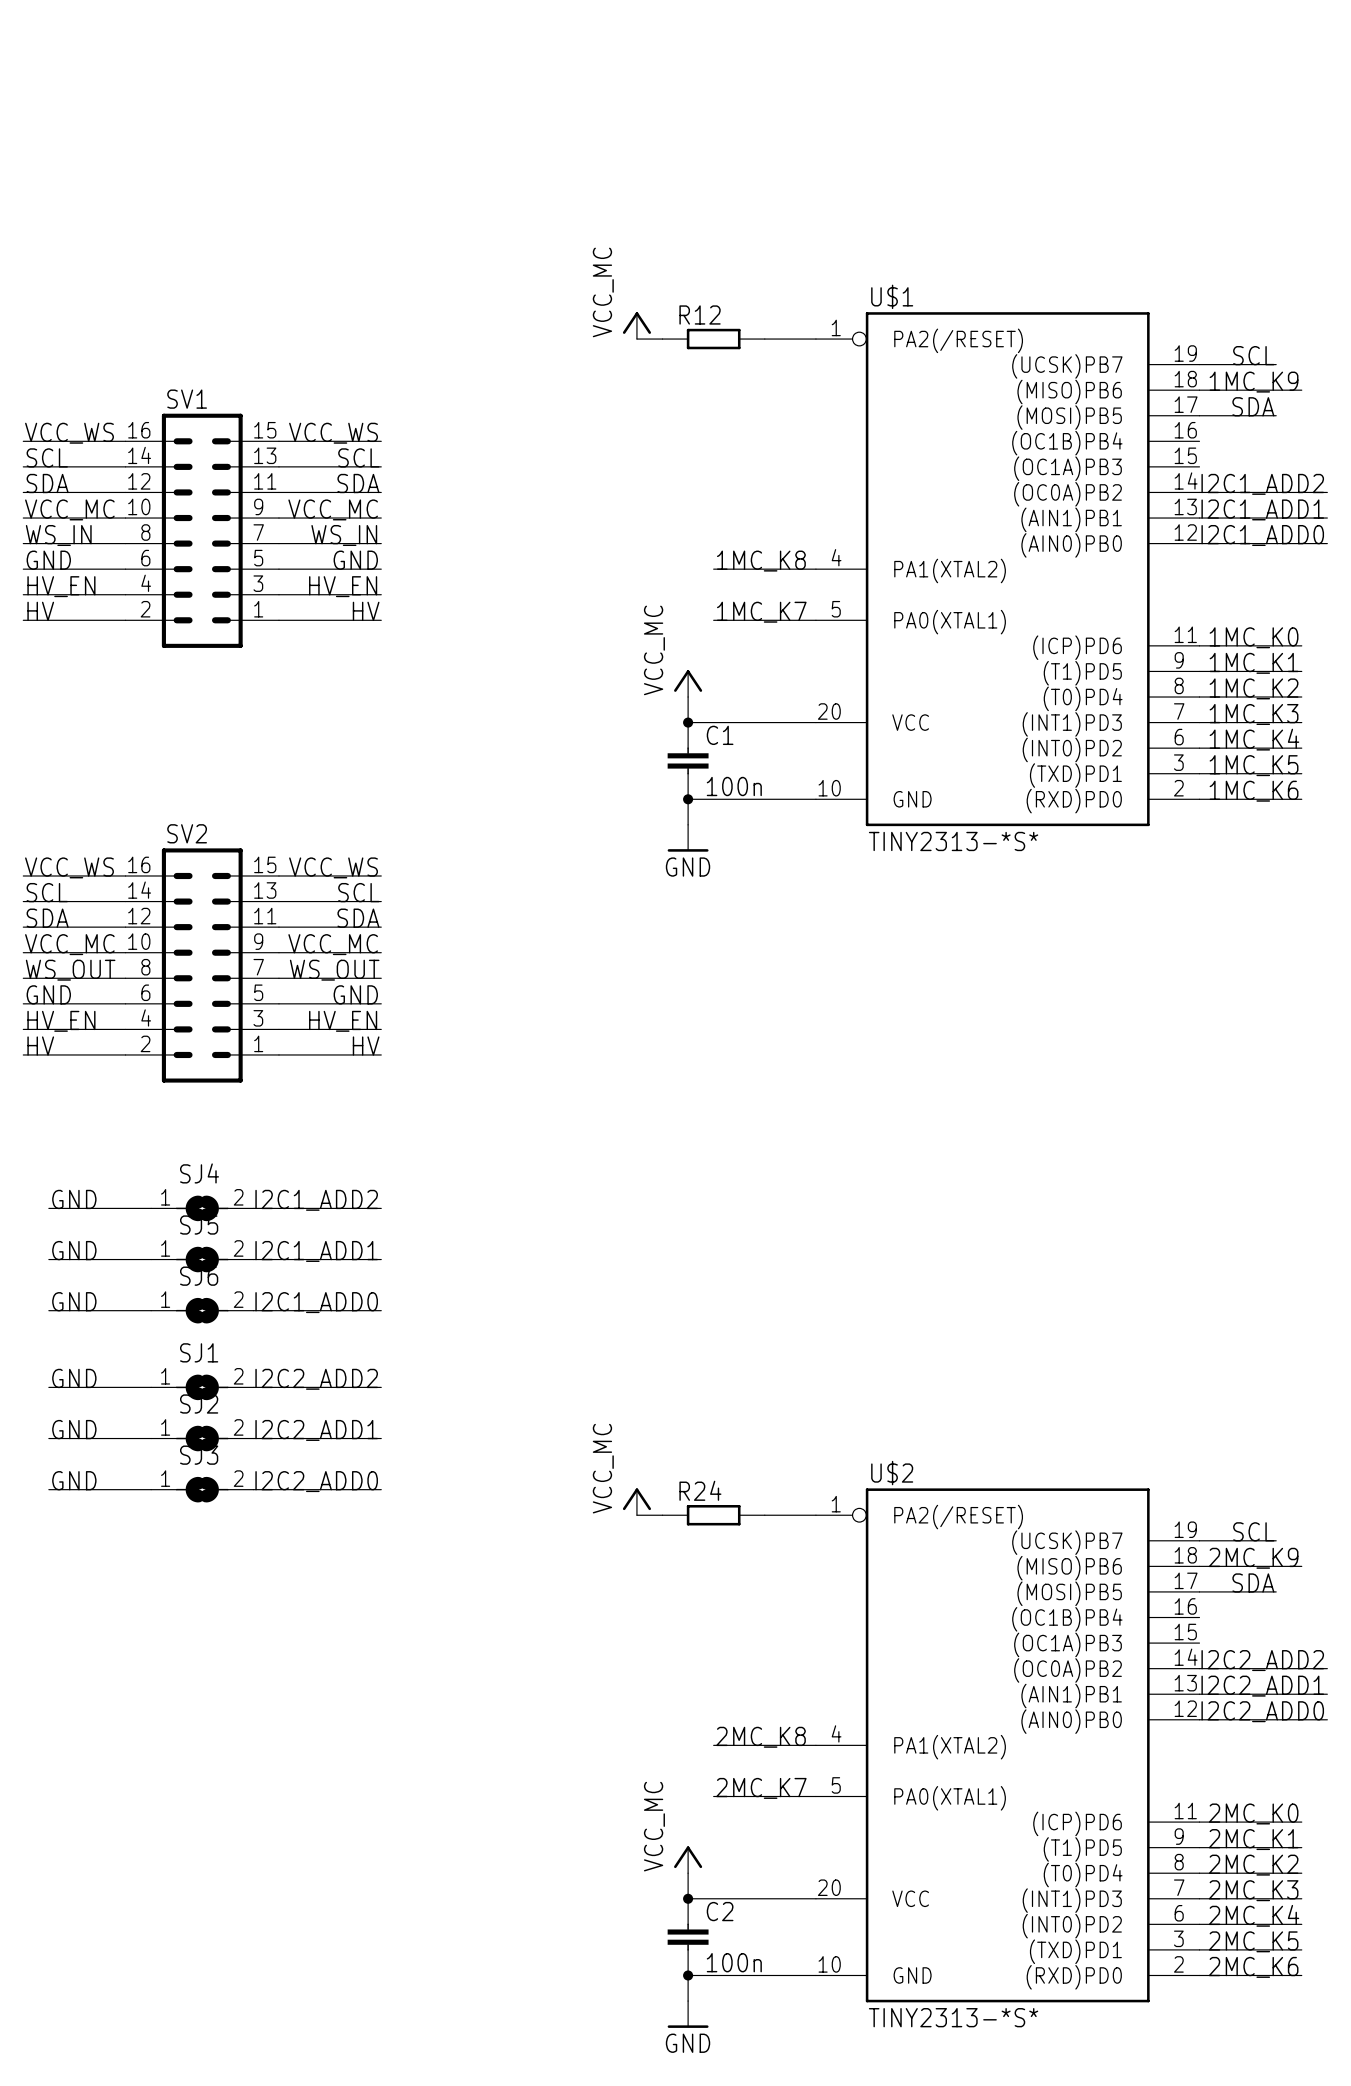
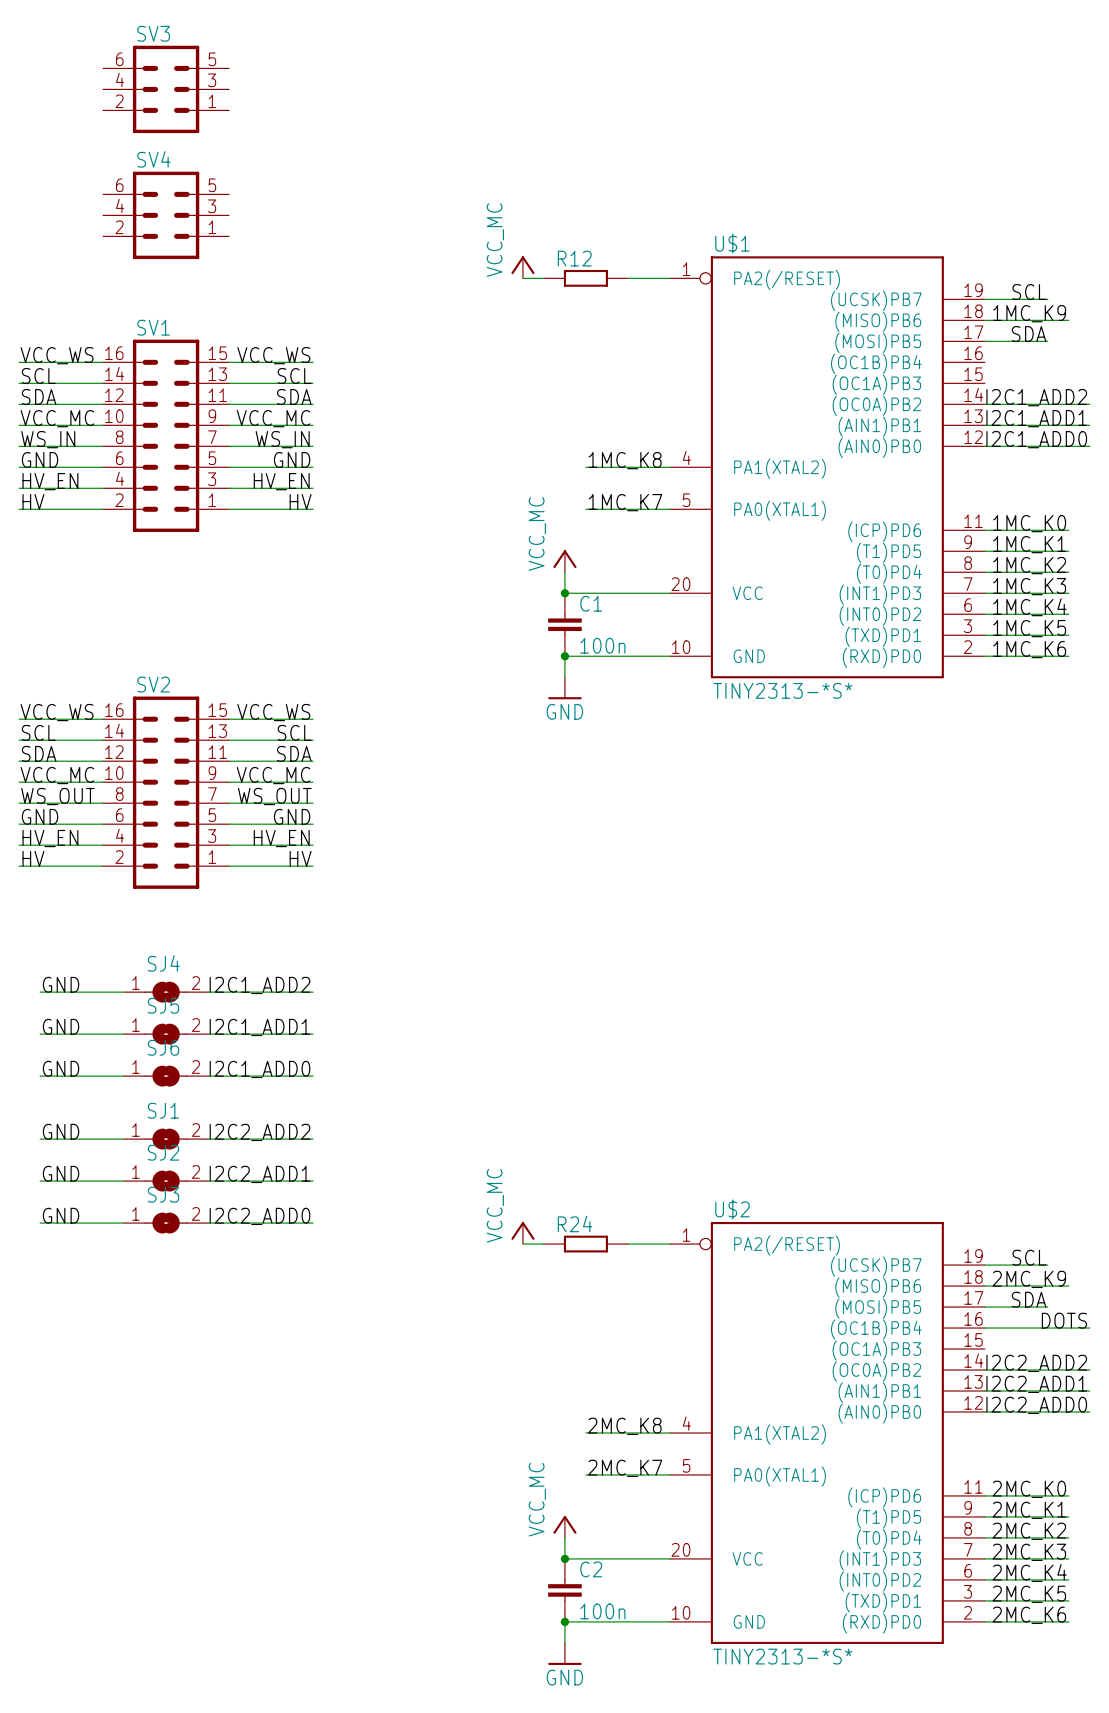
SV3: none -> (166, 89)
SV4: none -> (166, 215)
label: none -> DOTS (1064, 1320)
wire: none -> (984, 1328) (1089, 1328)

